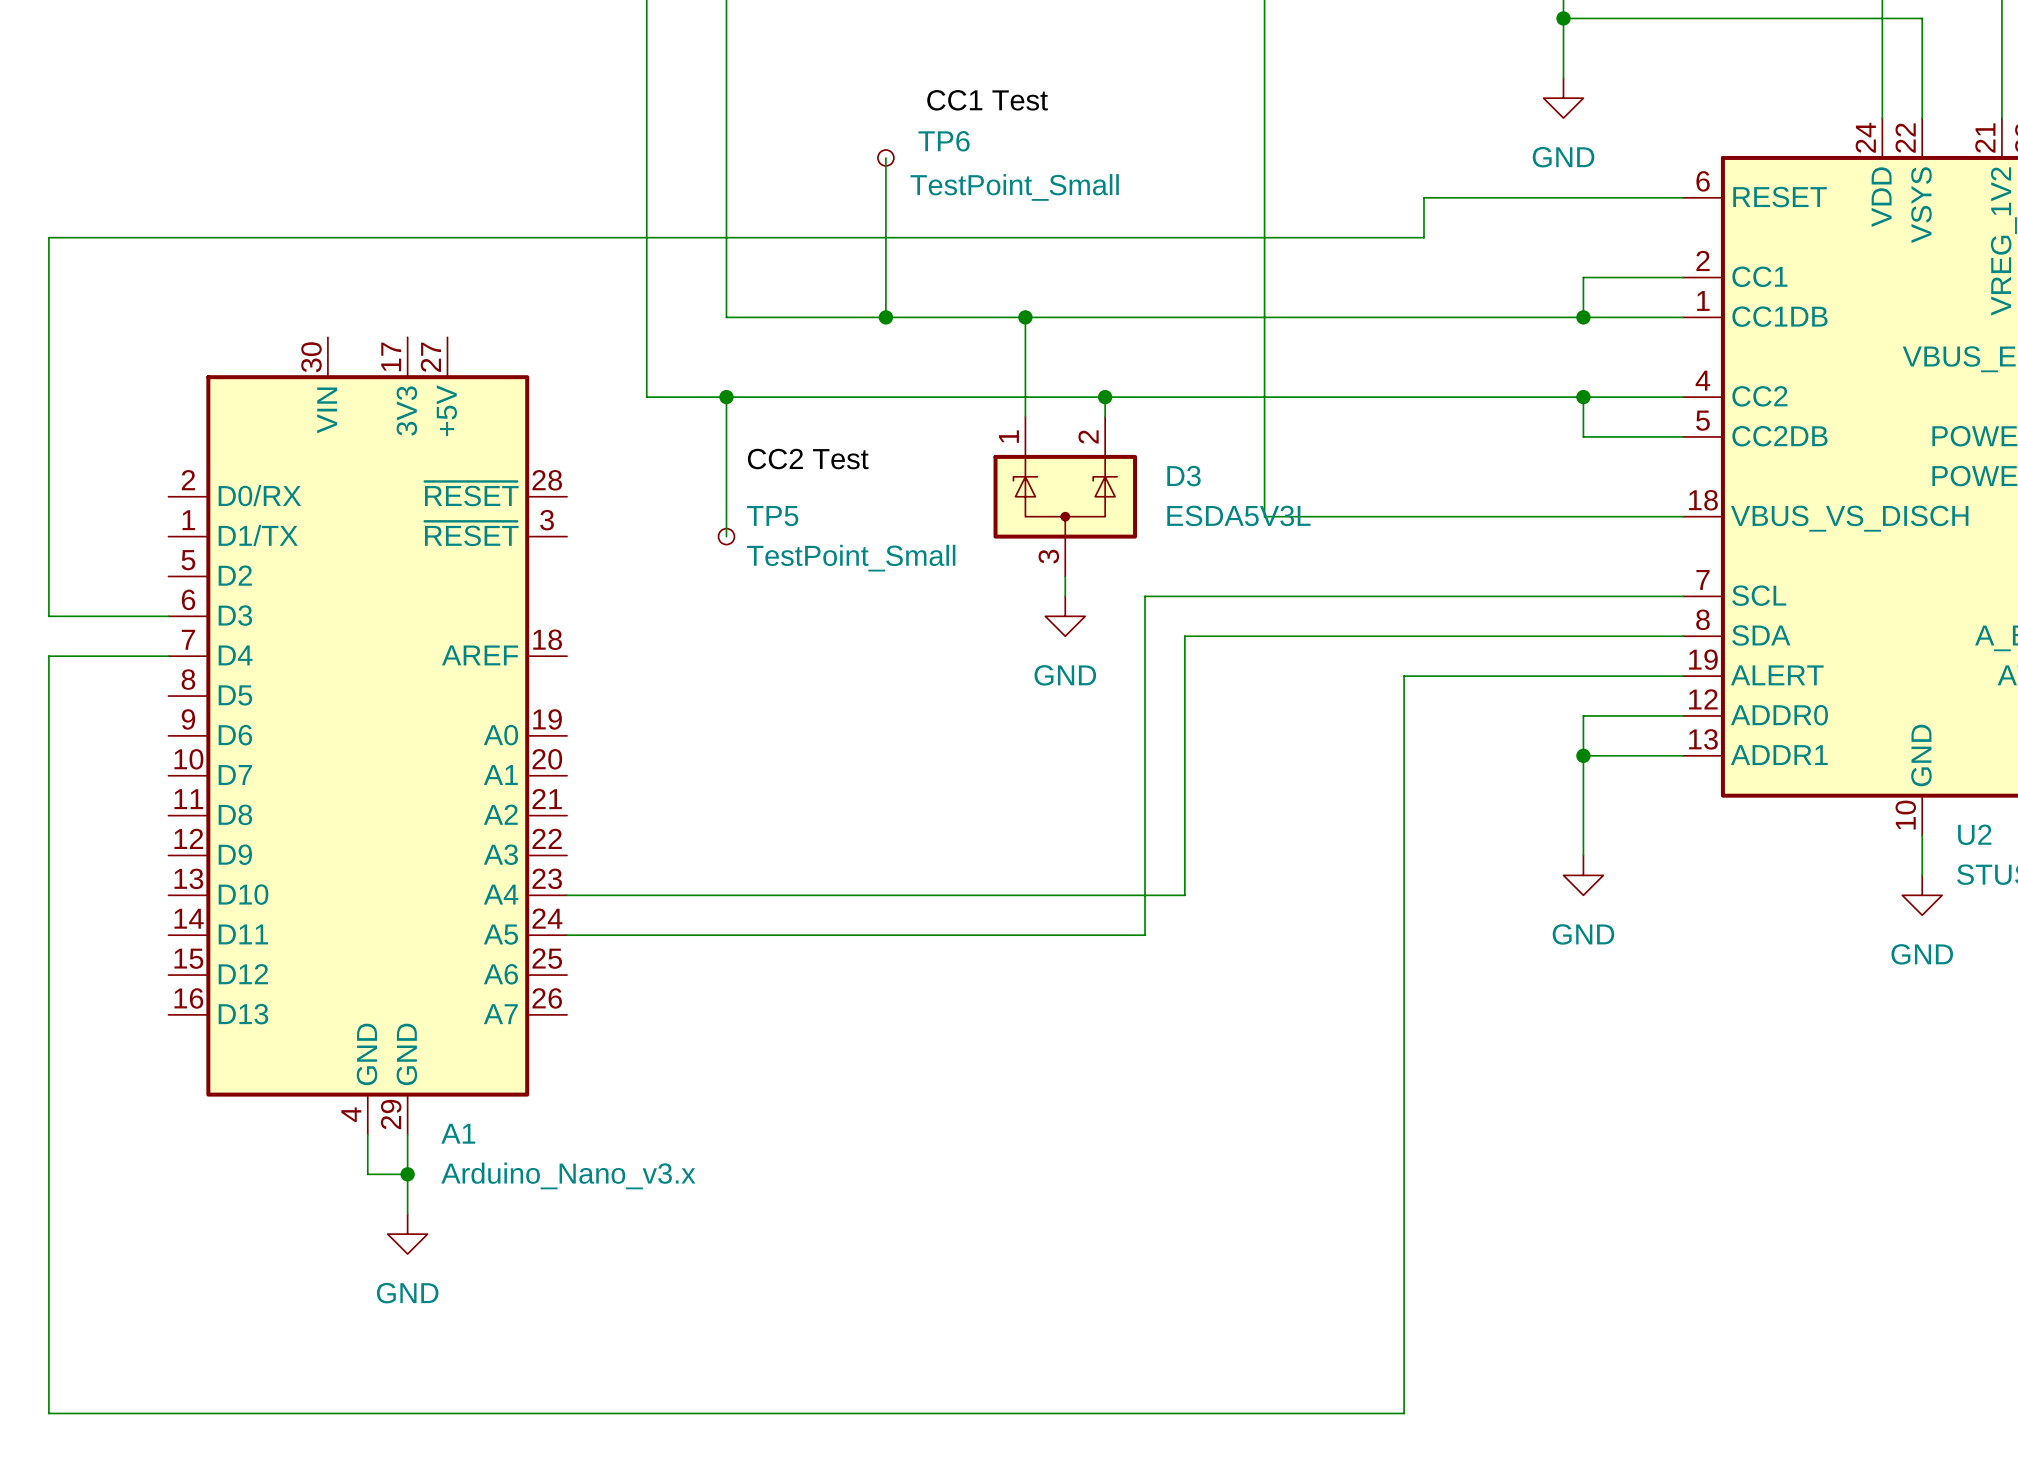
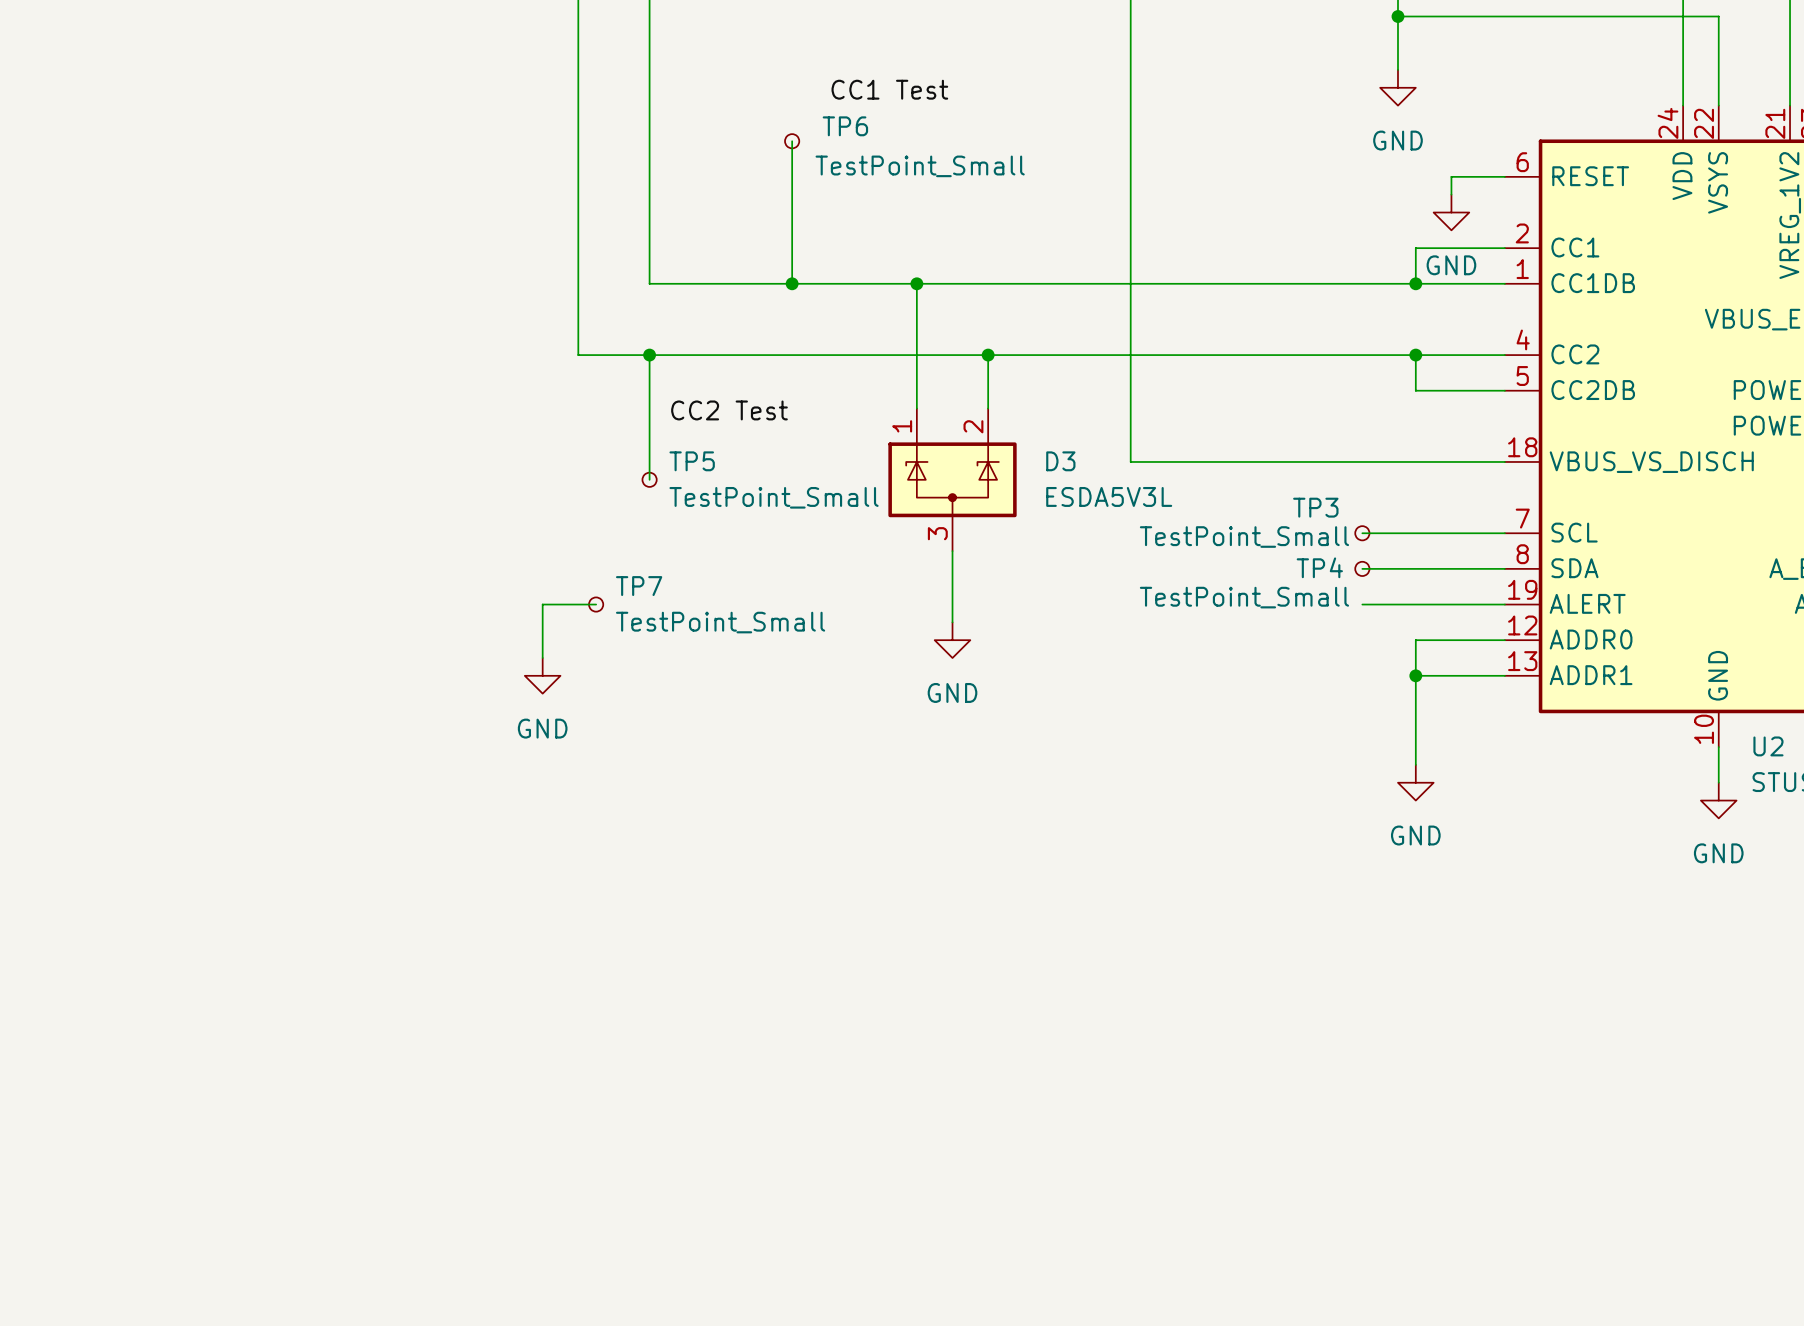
wire: (1623, 197) (1424, 197) (1424, 237) (48, 237) (48, 616) (168, 616) -> (1451, 176) (1451, 194)
power symbol: none -> GND (1451, 212)
D3 position: (1065, 496) -> (952, 479)
wire: (1523, 596) (1144, 596) (1144, 935) (567, 935) -> none
TP3: none -> TestPoint_Small (1362, 533)
wire: none -> (952, 551) (952, 622)
power symbol position: GND (1065, 616) -> GND (952, 640)
wire: (1523, 636) (1184, 636) (1184, 895) (567, 895) -> none
TP4: none -> TestPoint_Small (1362, 568)
wire: (168, 656) (48, 656) (48, 1413) (1404, 1413) (1404, 676) (1523, 676) -> none
wire: none -> (596, 604) (542, 604) (542, 658)
TP7: none -> TestPoint_Small (596, 604)
A1: Arduino_Nano_v3.x (367, 735) -> none
power symbol: none -> GND (542, 675)
wire: (367, 1134) (367, 1174) (407, 1174) -> none
wire: (407, 1134) (407, 1214) -> none
junction: (407, 1174) -> none
power symbol: GND (407, 1234) -> none

